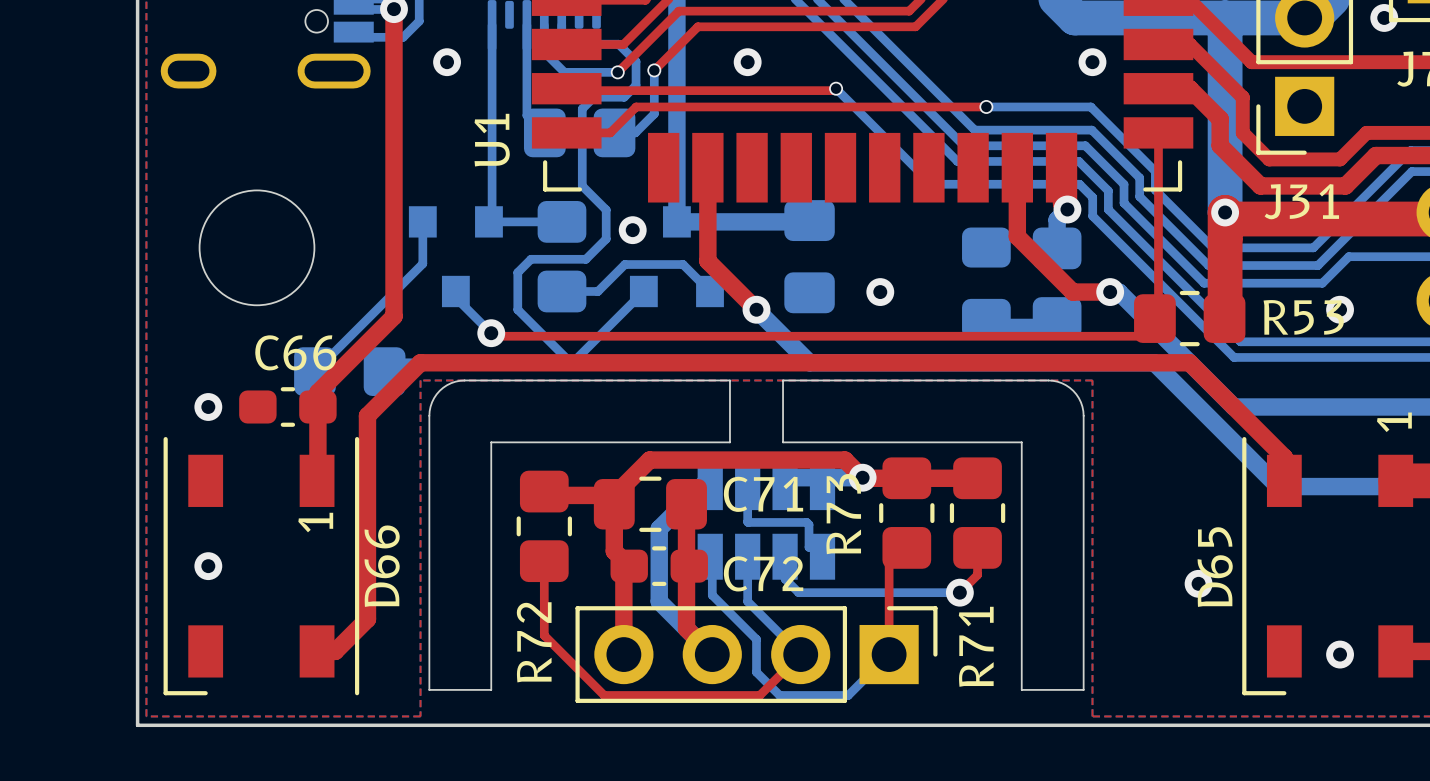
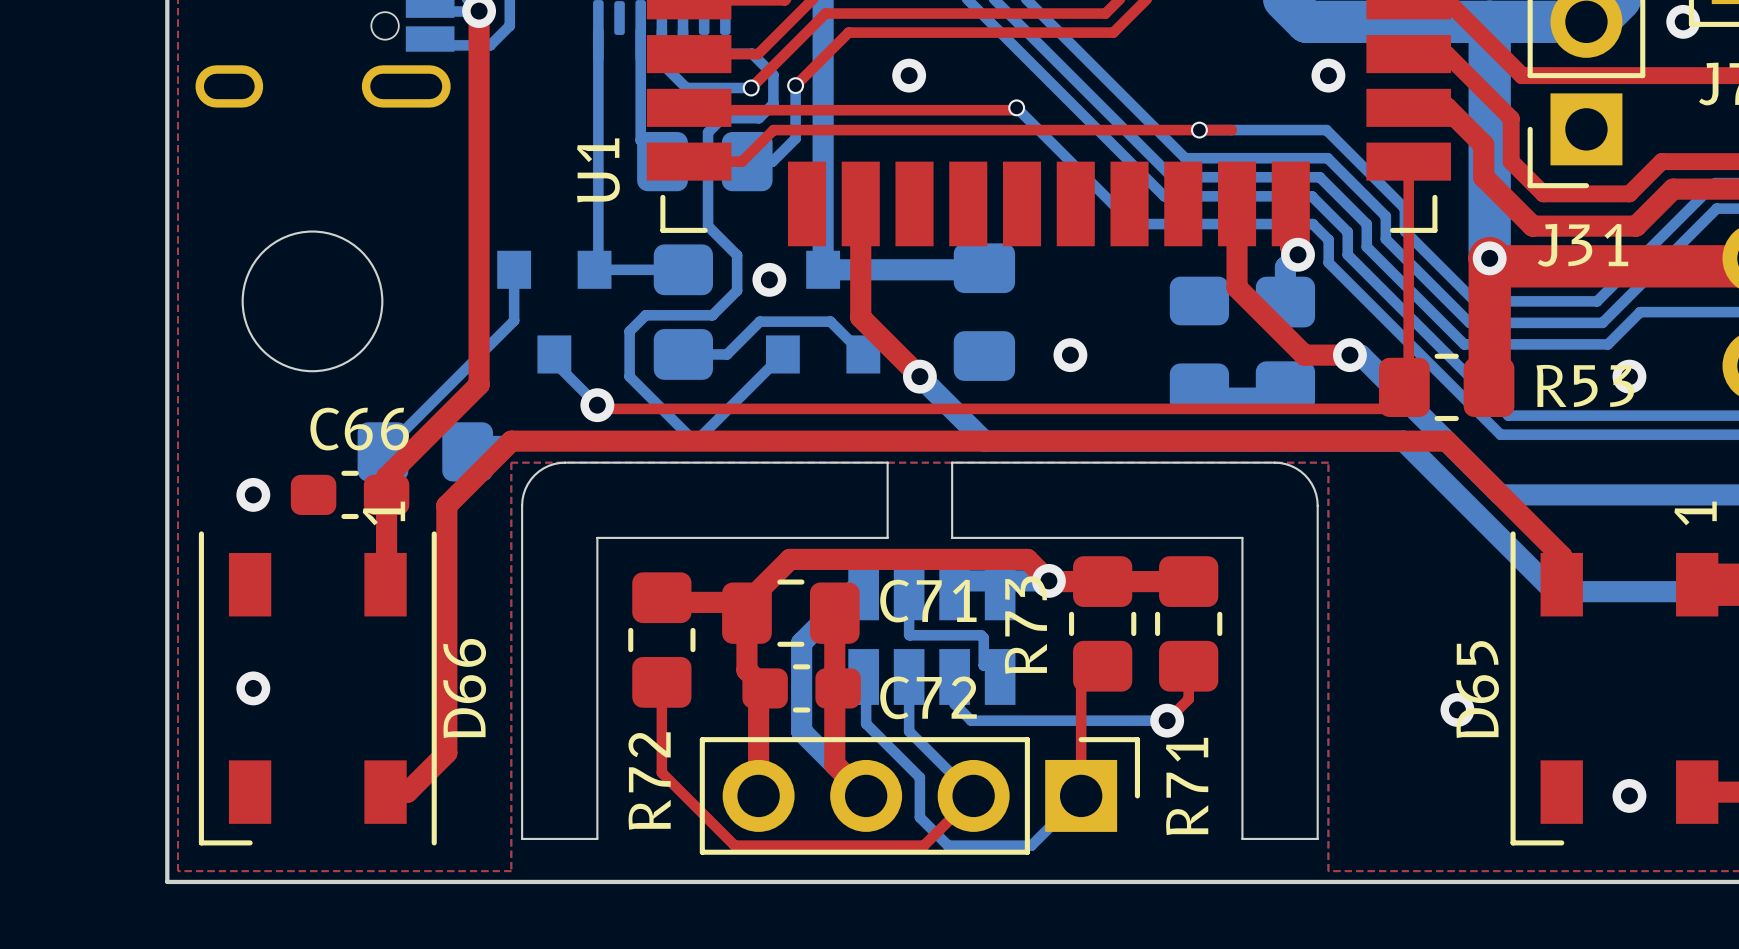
via: (447, 62) -> none
top track: none -> (1199, 130) (1231, 130)
D66 text position: 1 (315, 522) -> 1 (383, 513)

